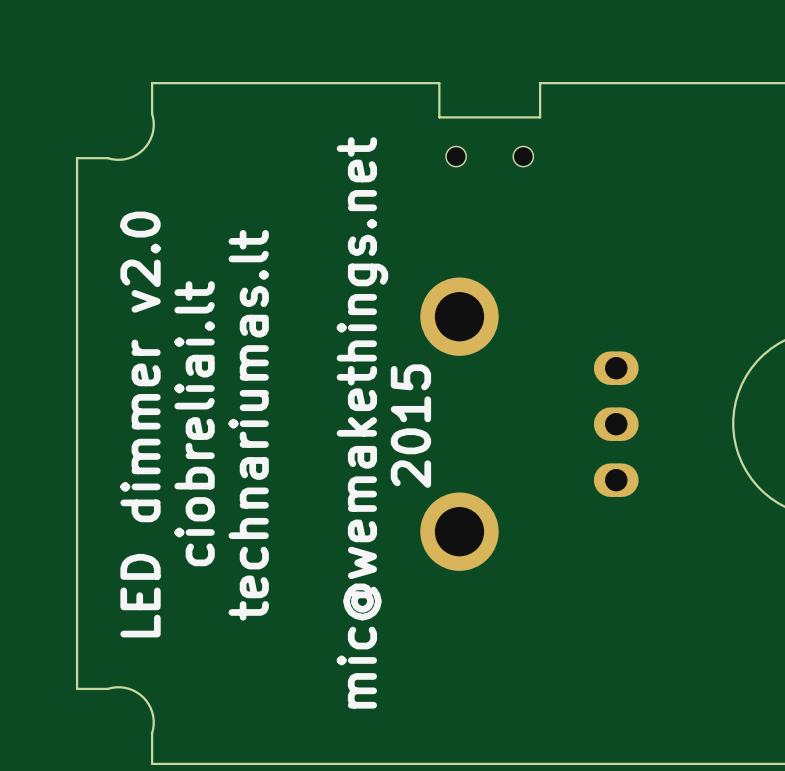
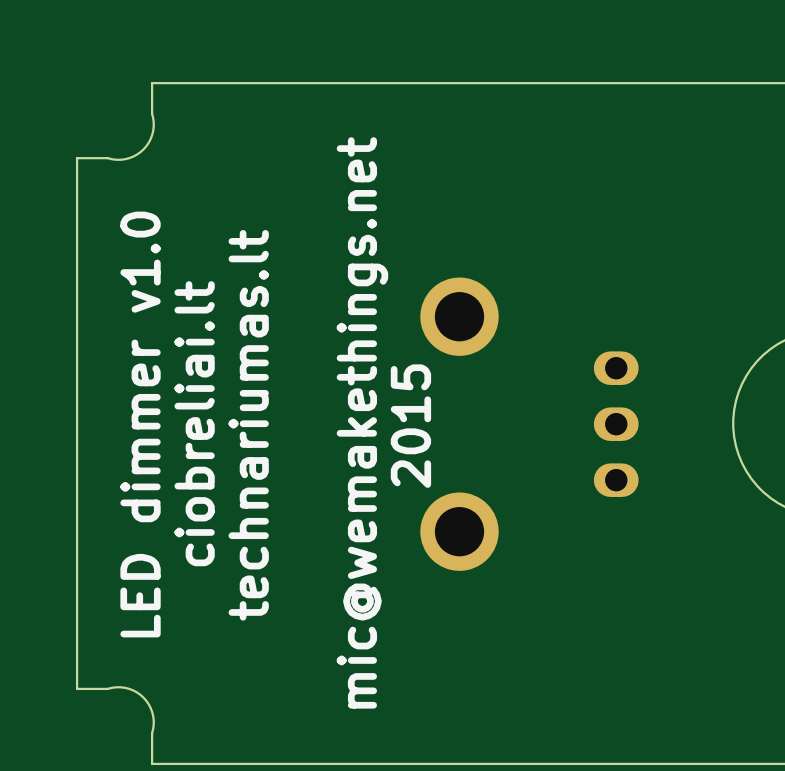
board edge: (540, 83) (540, 117) (439, 117) (439, 83) -> (540, 83) (439, 83)
part: (489, 156) -> none
text: LED dimmer v2.0 (140, 424) -> LED dimmer v1.0 (140, 424)

